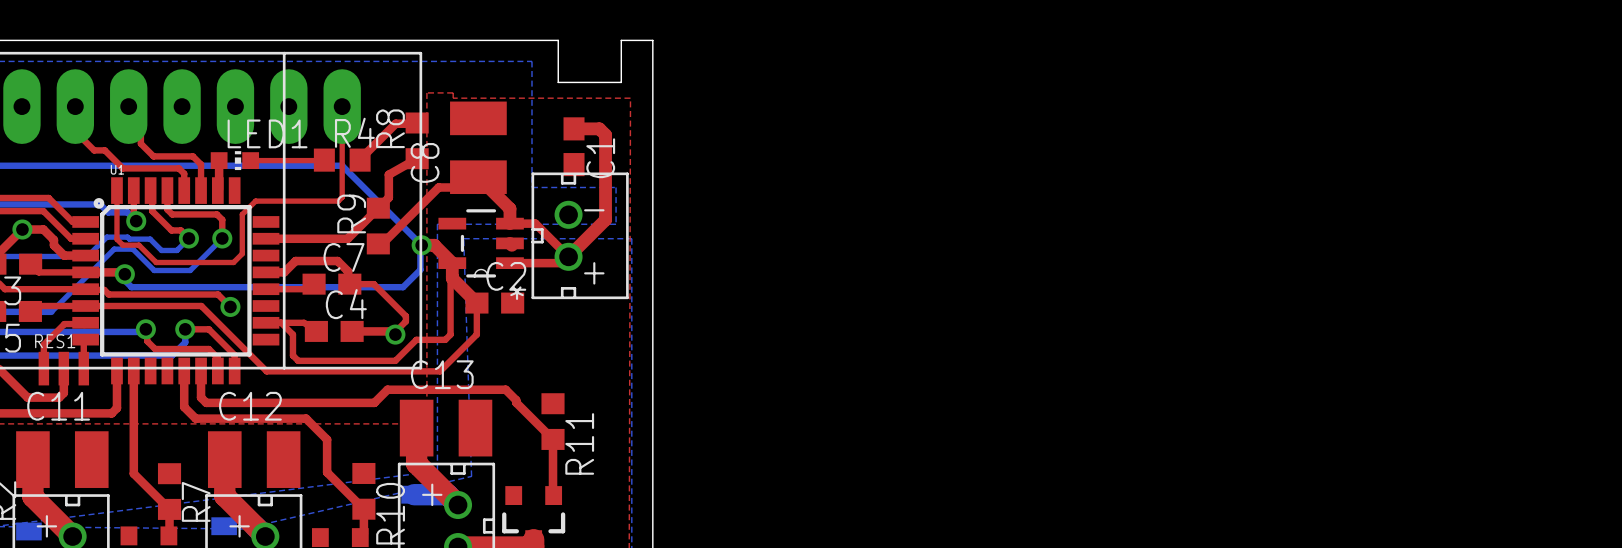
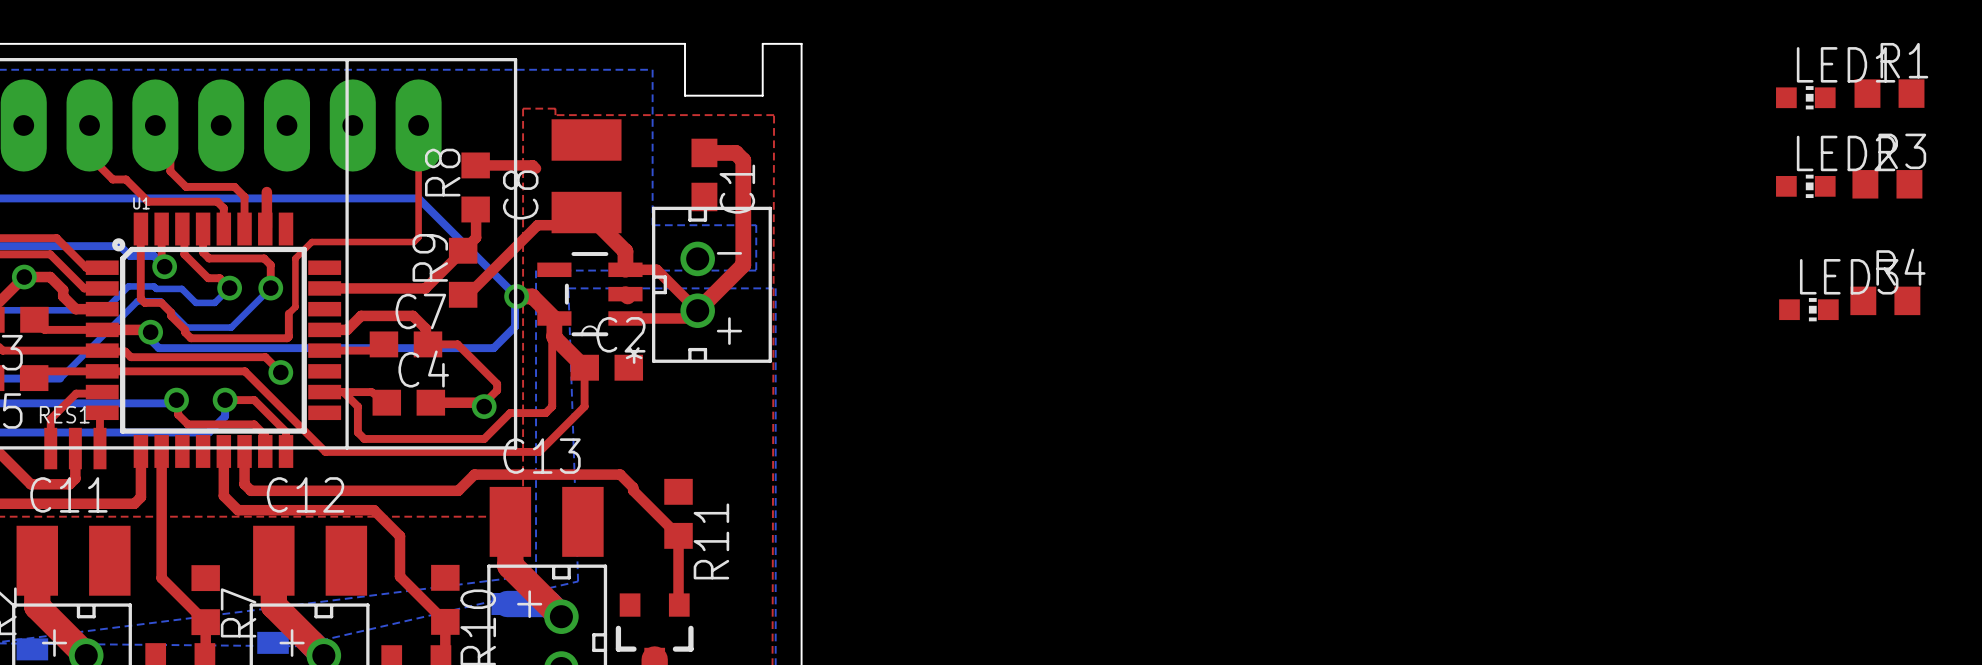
R1: none -> (1889, 93)
top track: (417, 122) (395, 123) (360, 160) -> none
top track: none -> (475, 165) (532, 165) (536, 168)
R8 position: (417, 140) -> (475, 187)
R3: none -> (1887, 184)
LED2: none -> (1805, 186)
top track: (417, 158) (388, 174) -> none
LED1 position: (234, 160) -> (1805, 97)
top track: (324, 160) (250, 160) -> none
R4 position: (342, 160) -> (1885, 300)
top track: (116, 190) (116, 239) (122, 245) (138, 245) (156, 262) (233, 262) (236, 259) -> (140, 229) (140, 298) (144, 302) (161, 302) (190, 338) (287, 338) (288, 336) (288, 313)
LED3: none -> (1808, 309)

